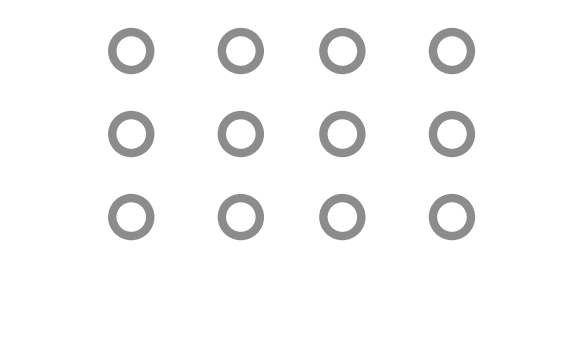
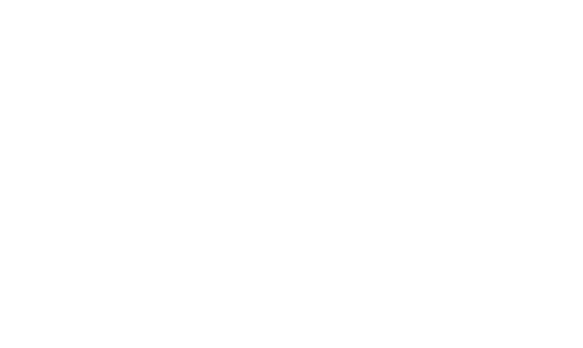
part: (186, 134) -> none
part: (397, 134) -> none

